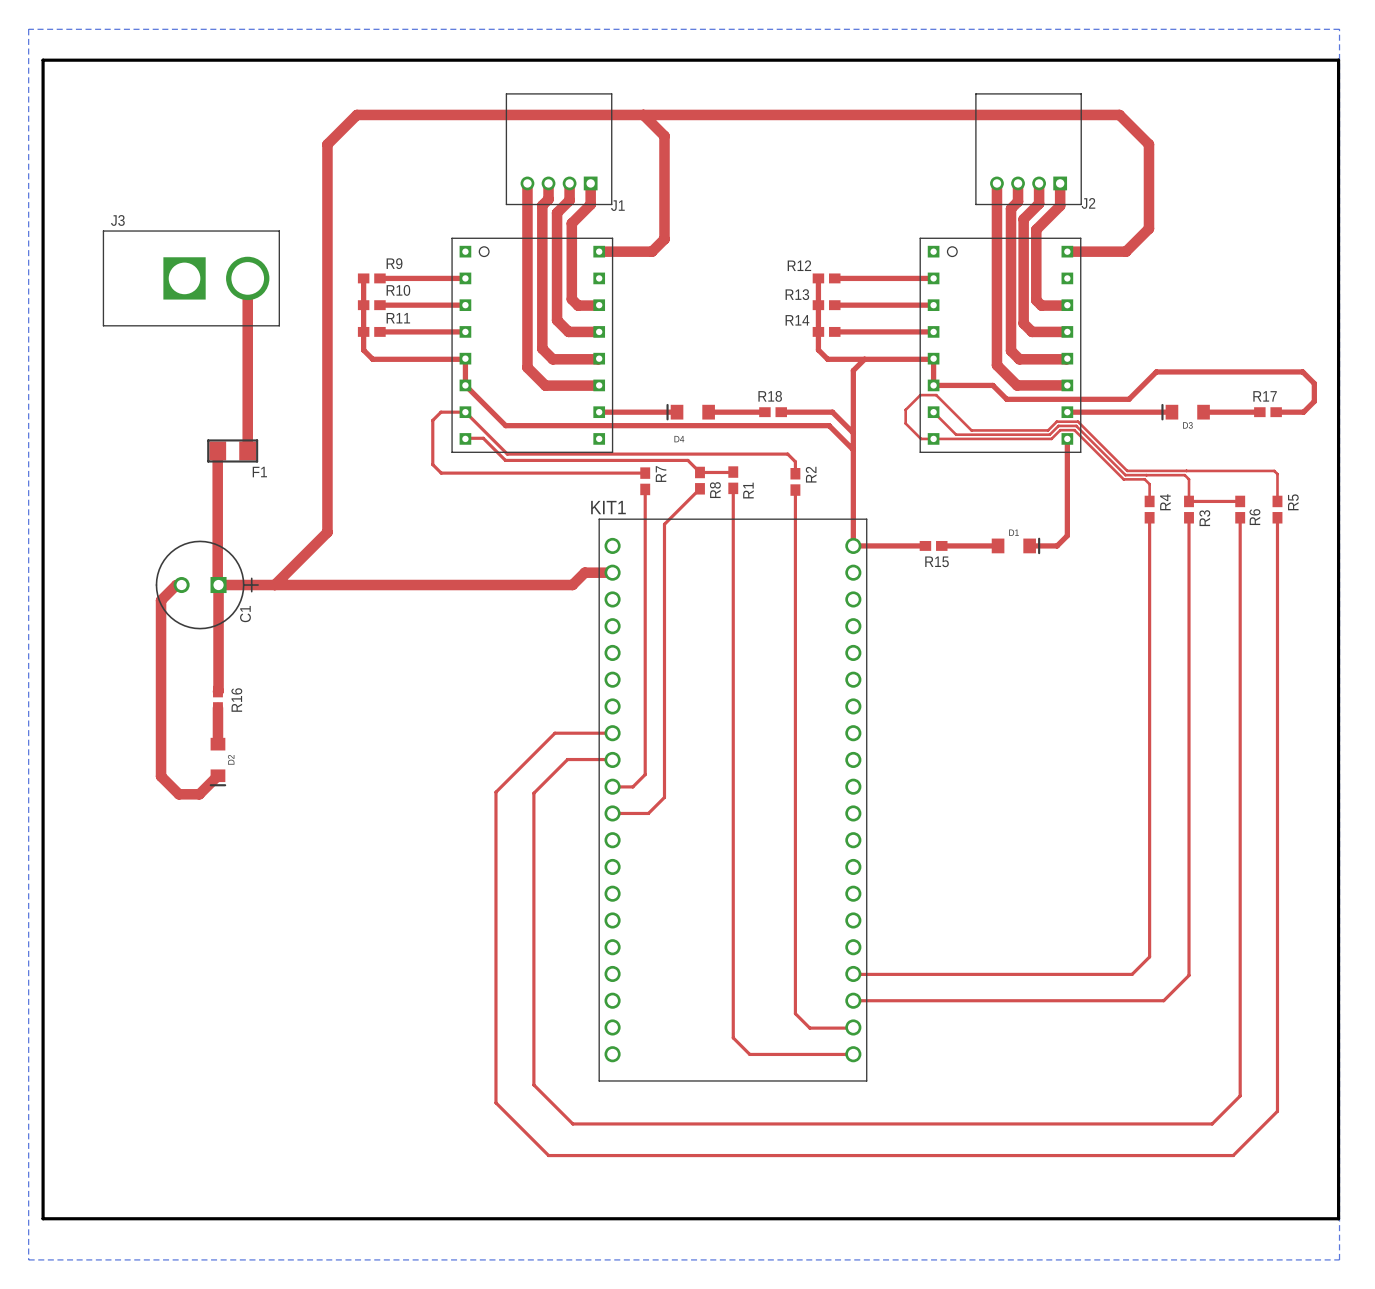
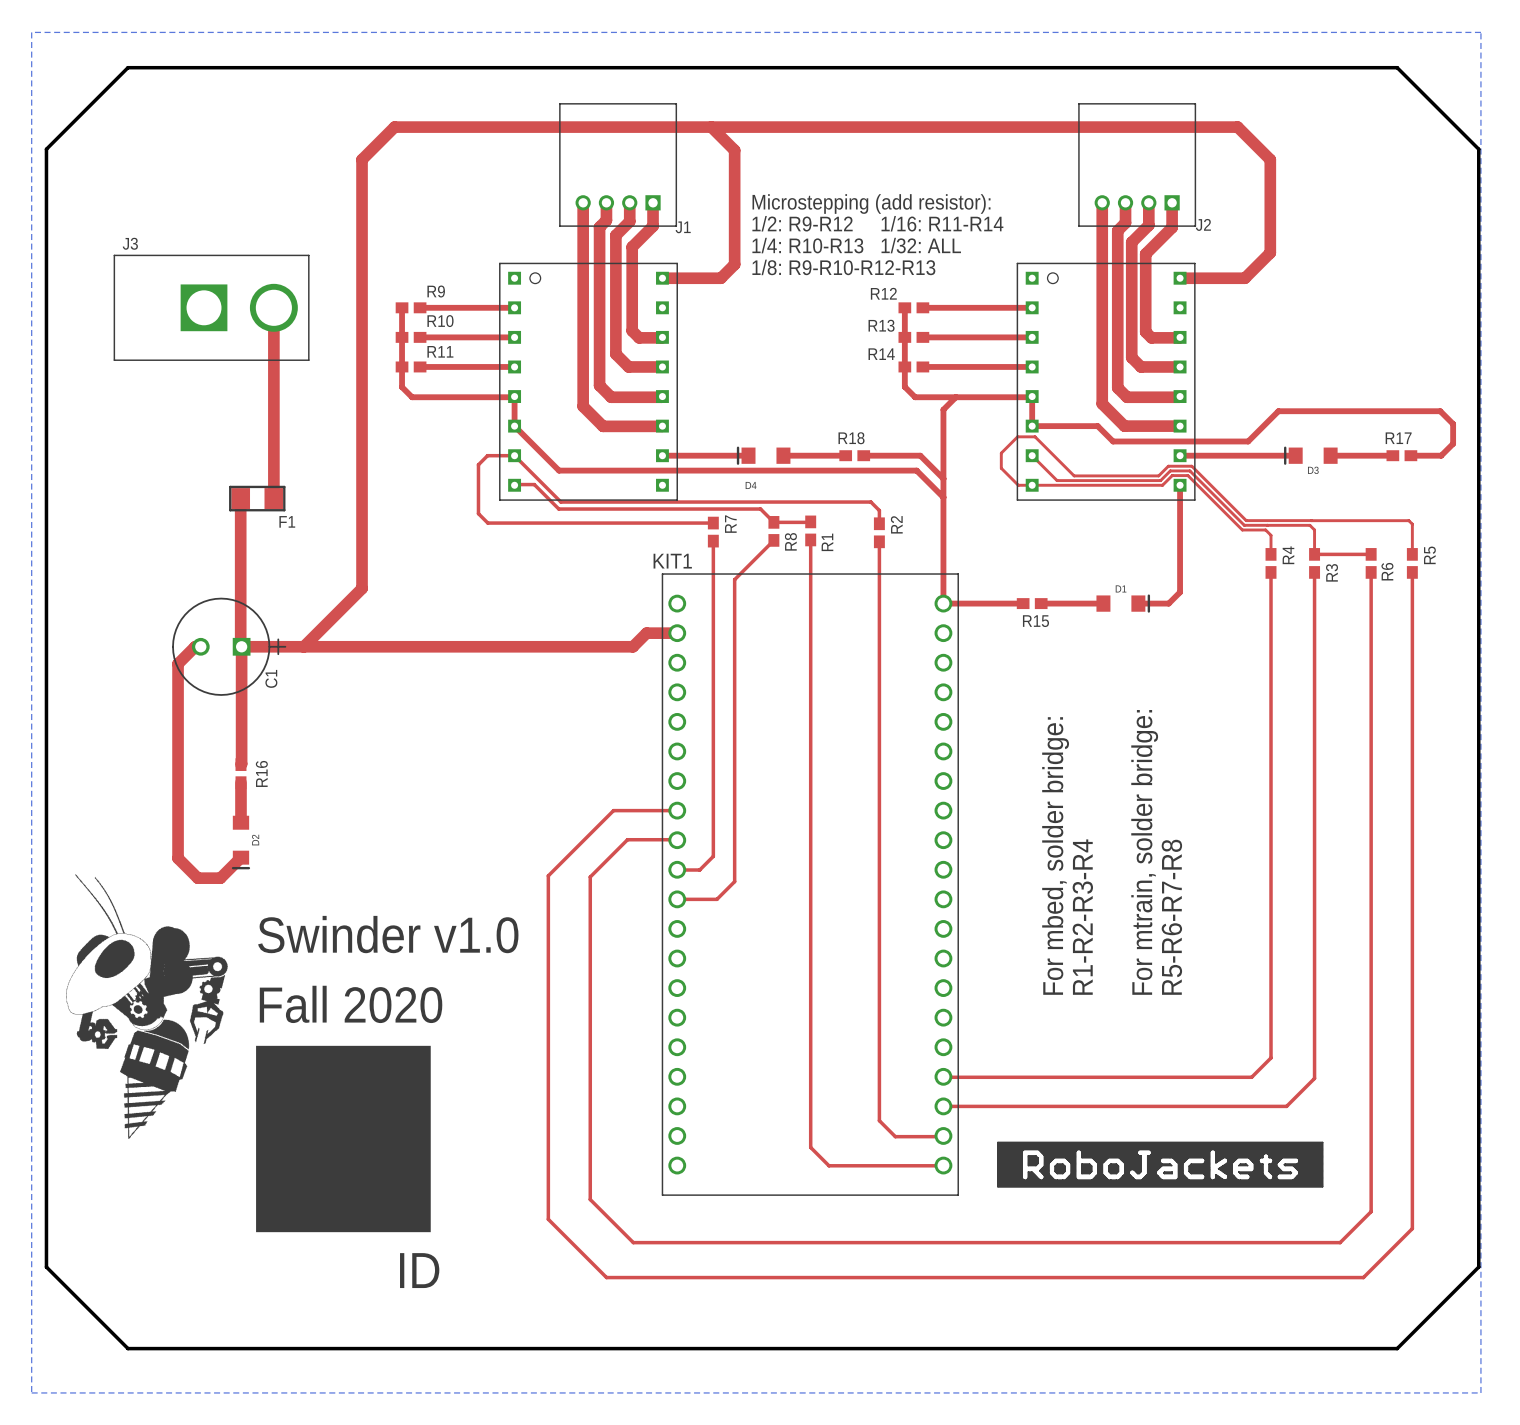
board edge: (43, 60) (1338, 60) (1338, 1218) (43, 1218) (43, 60) -> (127, 67) (46, 149) (46, 1267) (127, 1348) (1397, 1348) (1478, 1267) (1478, 149) (1397, 67) (127, 67)
text: none -> Microstepping (add resistor): (871, 204)
text: none -> 1/2: R9-R12 1/16: R11-R14 (877, 223)
text: none -> 1/4: R10-R13 1/32: ALL (856, 245)
text: none -> 1/8: R9-R10-R12-R13 (843, 267)
text: none -> For mtrain, solder bridge: (1144, 852)
text: none -> For mbed, solder bridge: (1055, 855)
drawing: none -> [66, 874, 228, 1139]
text: none -> R1-R2-R3-R4 (1082, 917)
text: none -> R5-R6-R7-R8 (1171, 917)
text: none -> Swinder v1.0 (388, 934)
text: none -> Fall 2020 (351, 1004)
drawing: none -> [256, 1045, 431, 1233]
drawing: none -> [997, 1141, 1324, 1188]
text: none -> ID (419, 1270)

